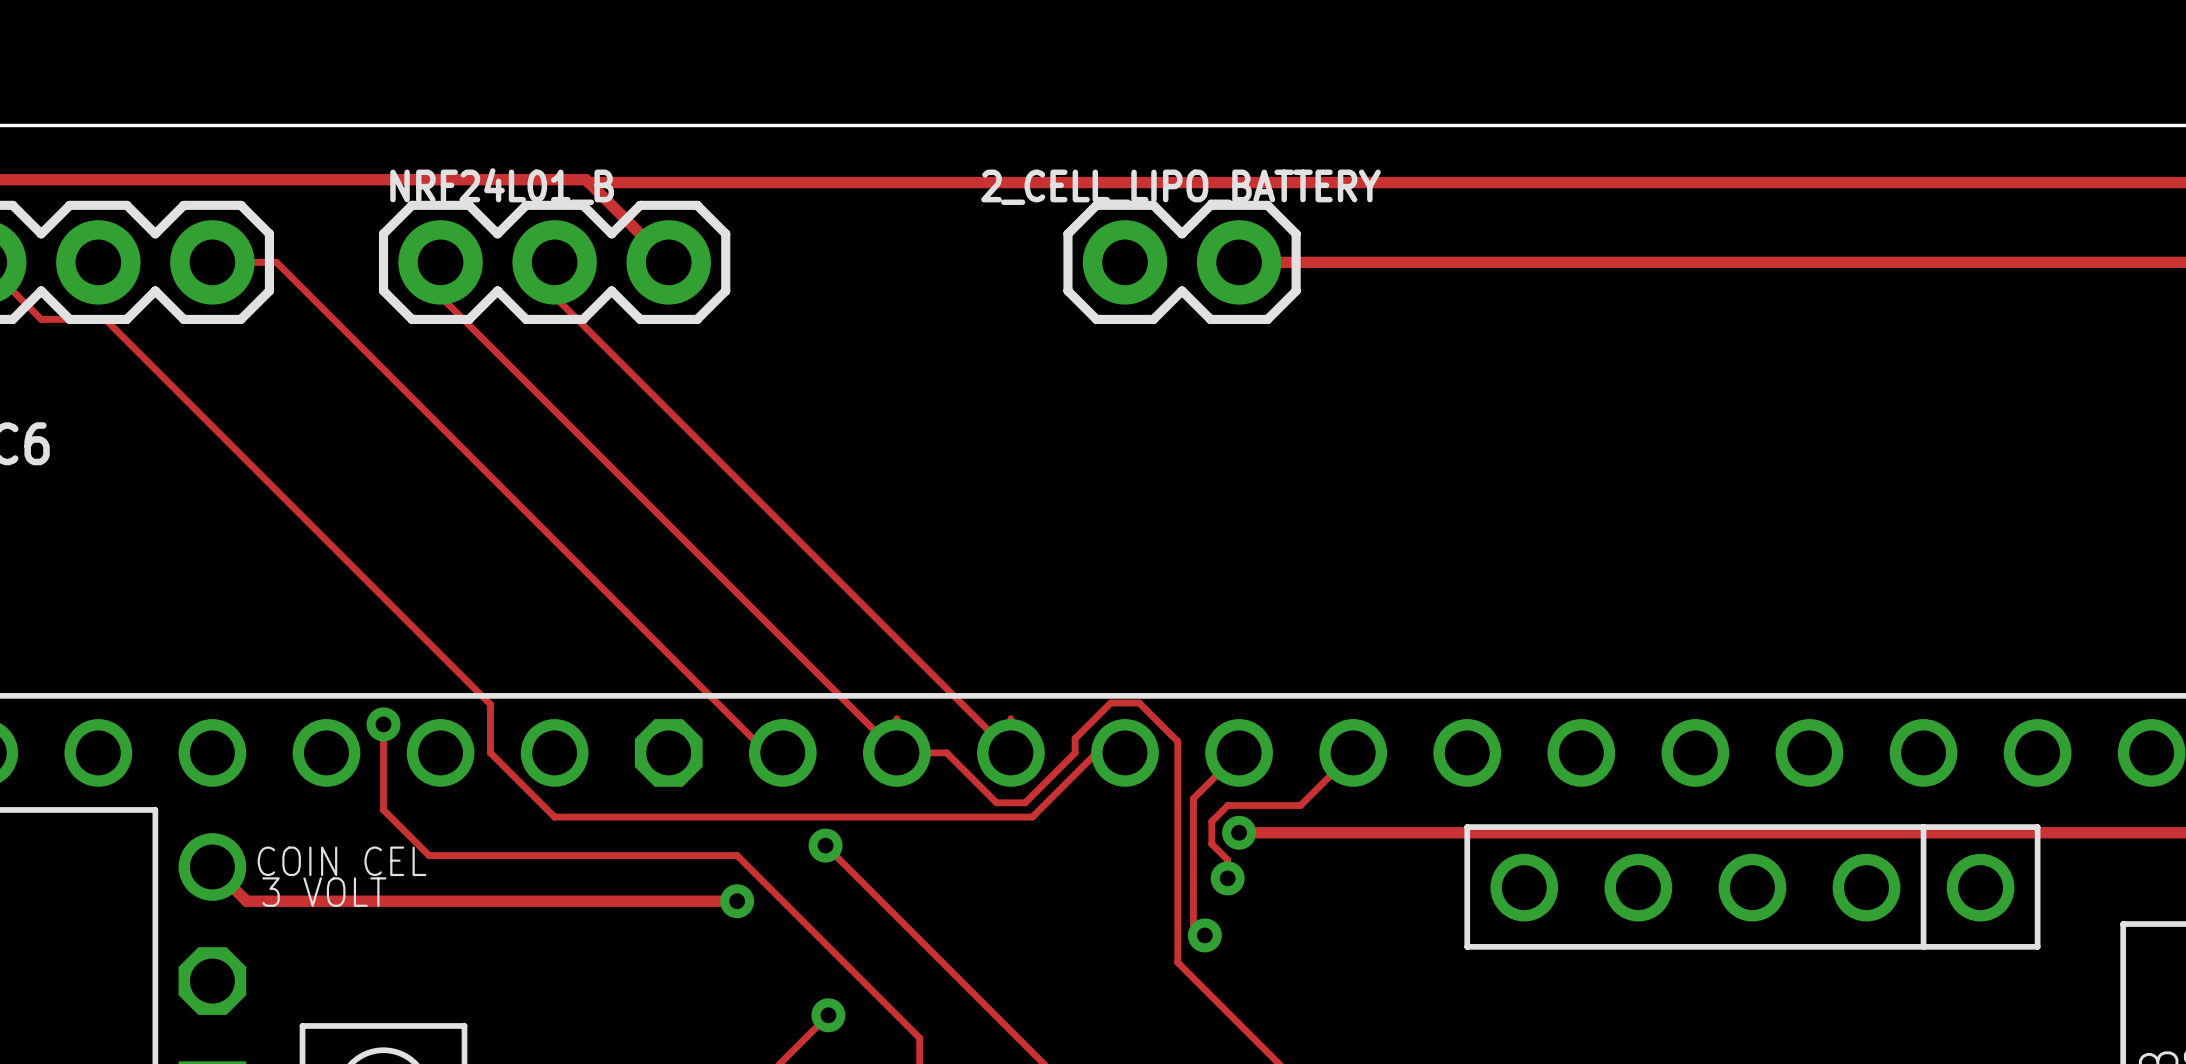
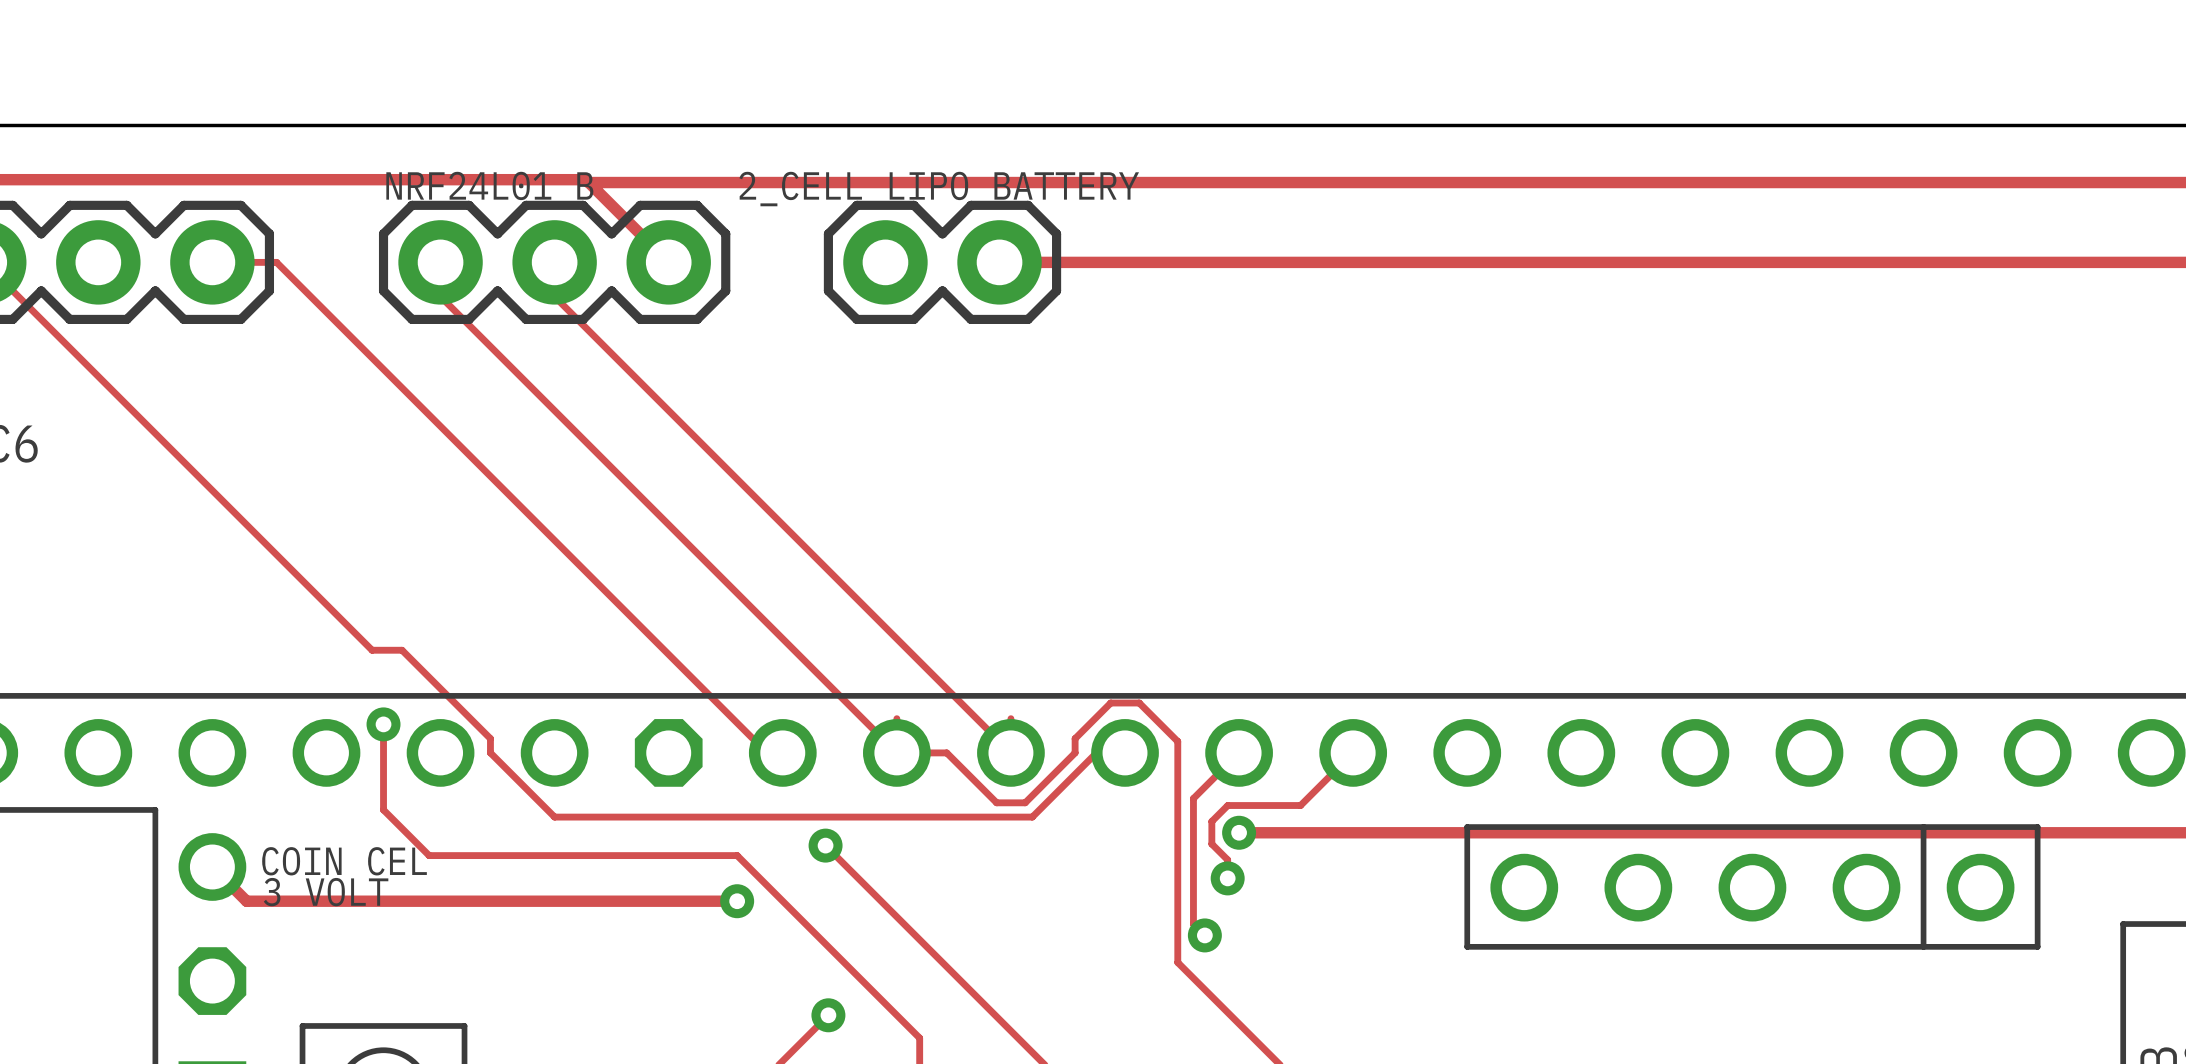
track: none -> (999, 262) (1239, 262)
2_CELL_LIPO_BATTERY position: (1182, 262) -> (942, 262)
track: (41, 319) (105, 319) (490, 704) (490, 738) -> (41, 319) (372, 650) (402, 650) (490, 738)

